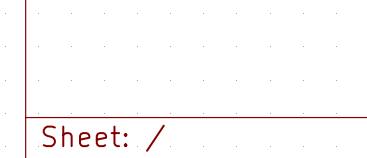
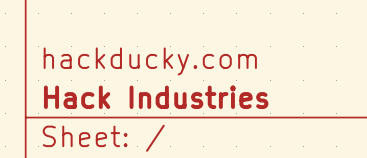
title block: none -> hackducky.com (150, 61)
title block: none -> Hack Industries (156, 97)

